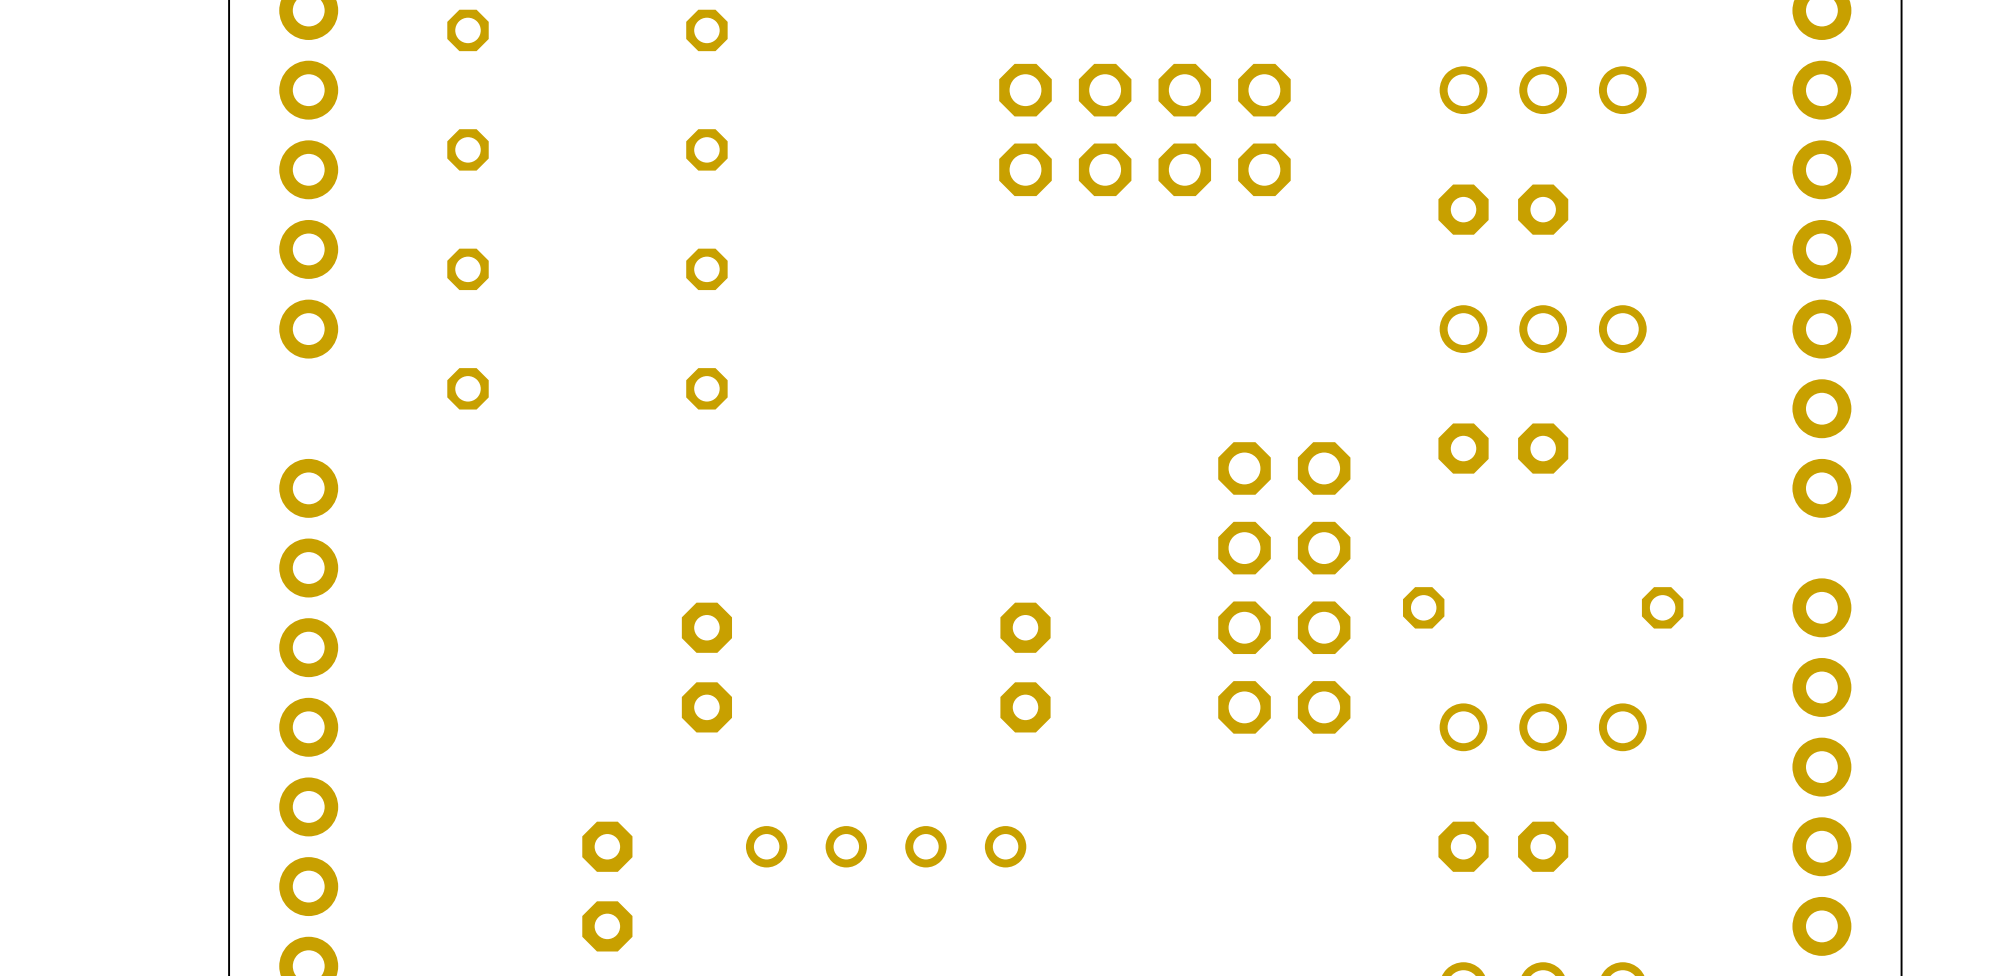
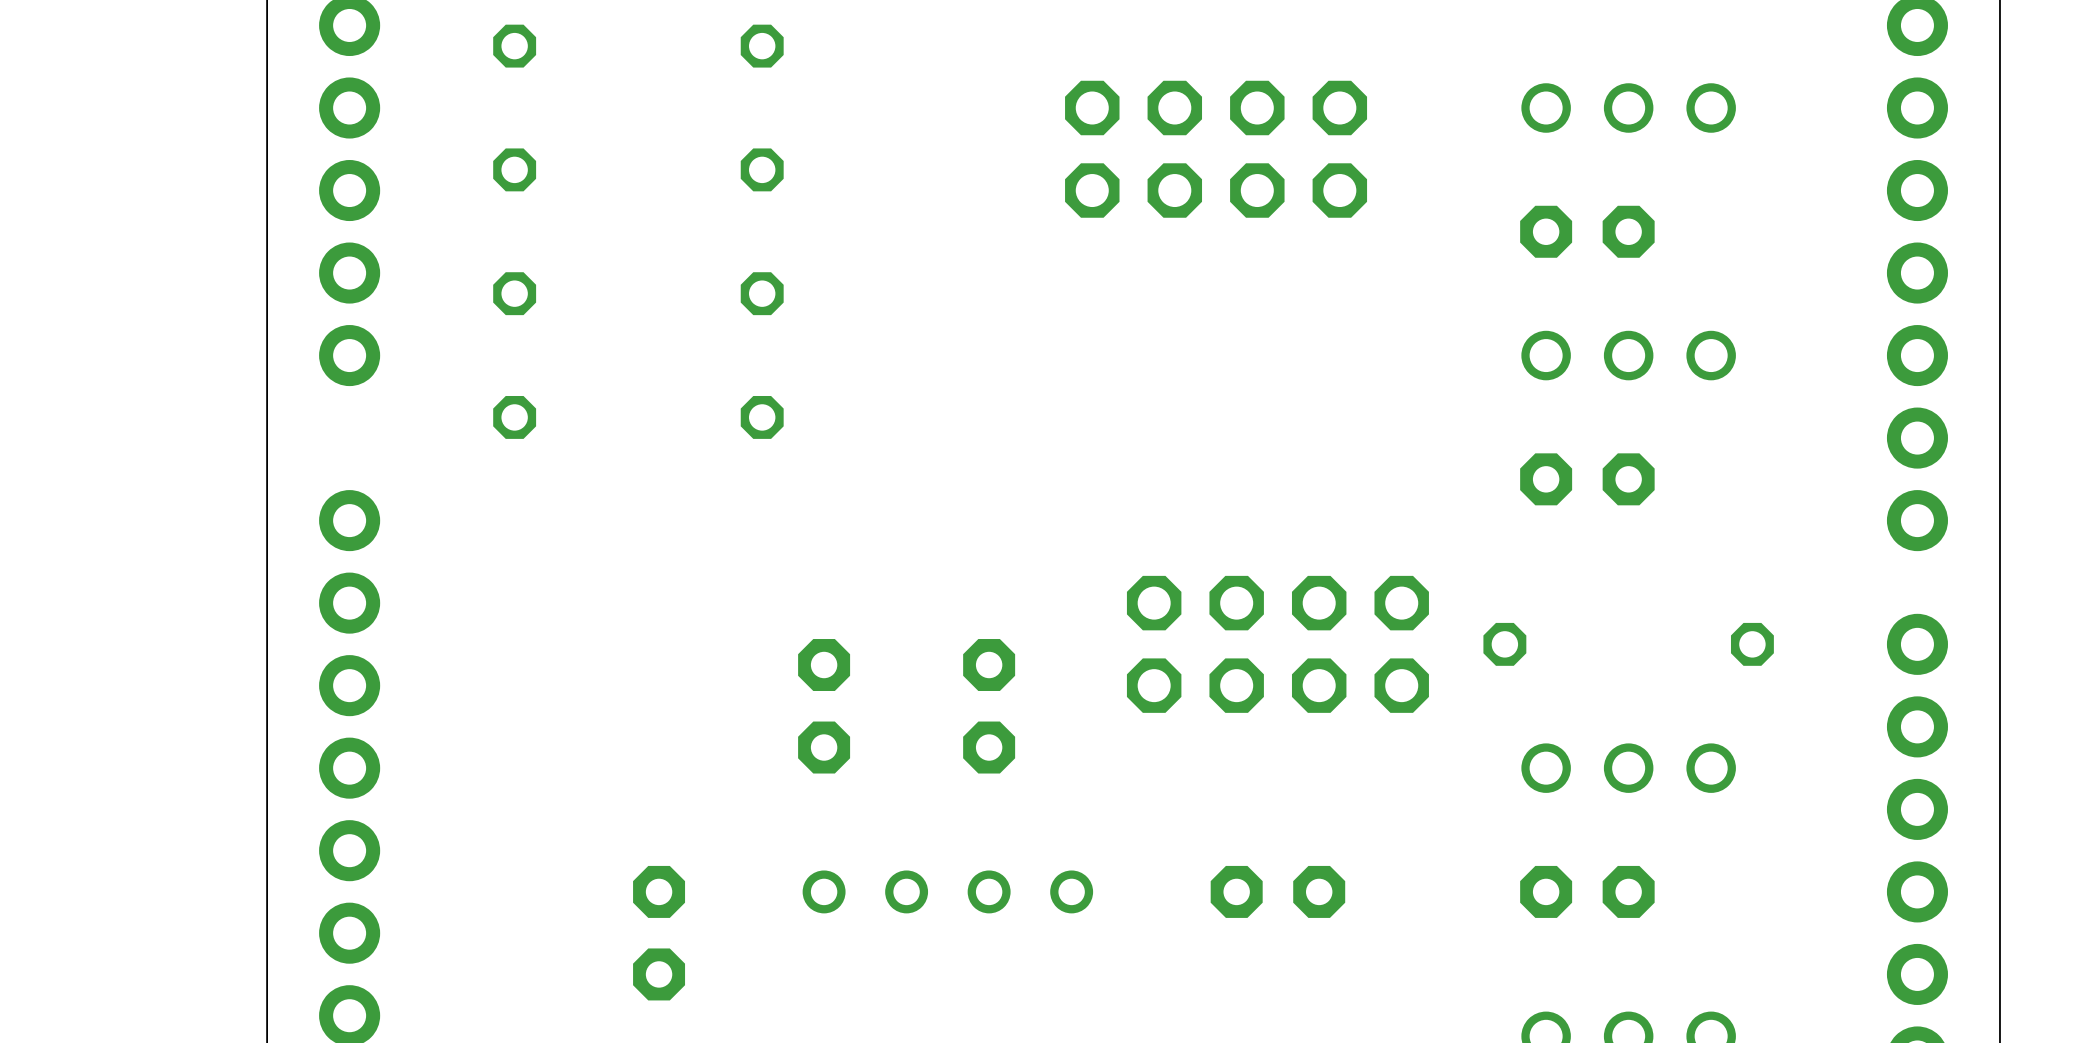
part rotation: 0° (1284, 587) -> 90° clockwise (1277, 644)
part position: (706, 667) -> (824, 706)
part position: (1025, 667) -> (989, 706)
part: none -> (1277, 891)

